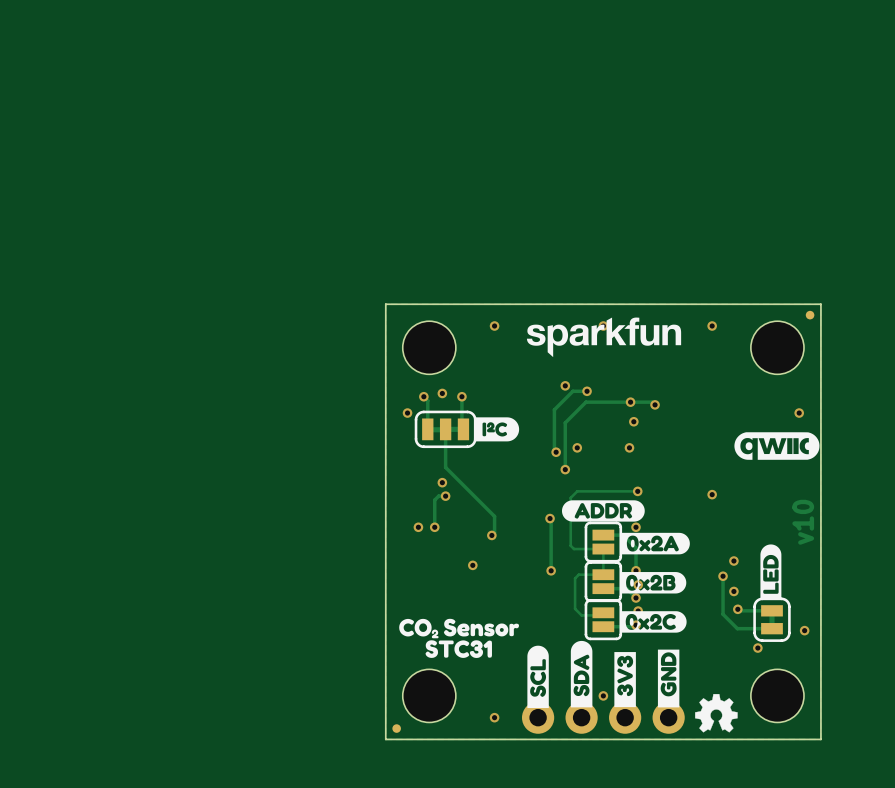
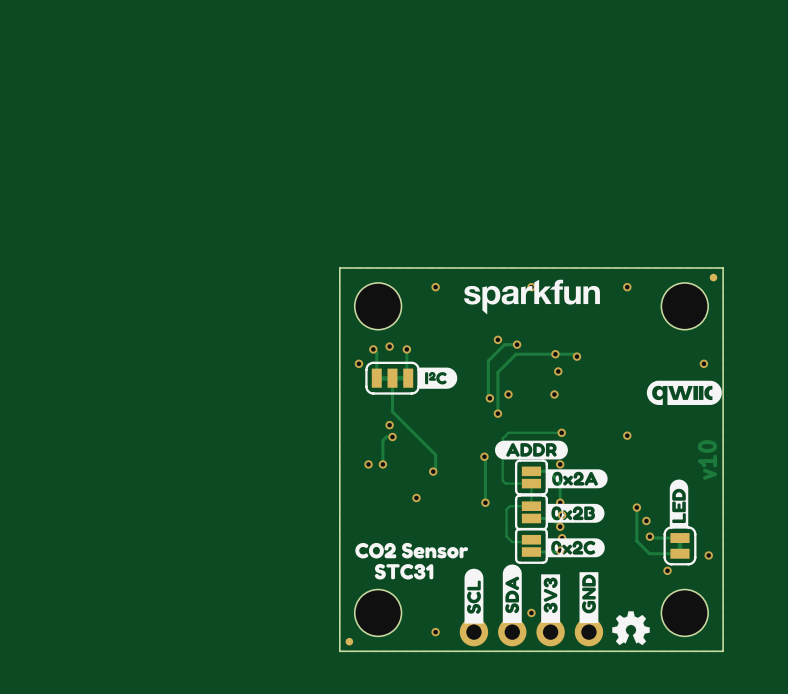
via: (733, 561) -> none
drawing shape: [399, 618, 519, 637] -> [355, 542, 469, 559]
drawing: [431, 629, 439, 639] -> none

